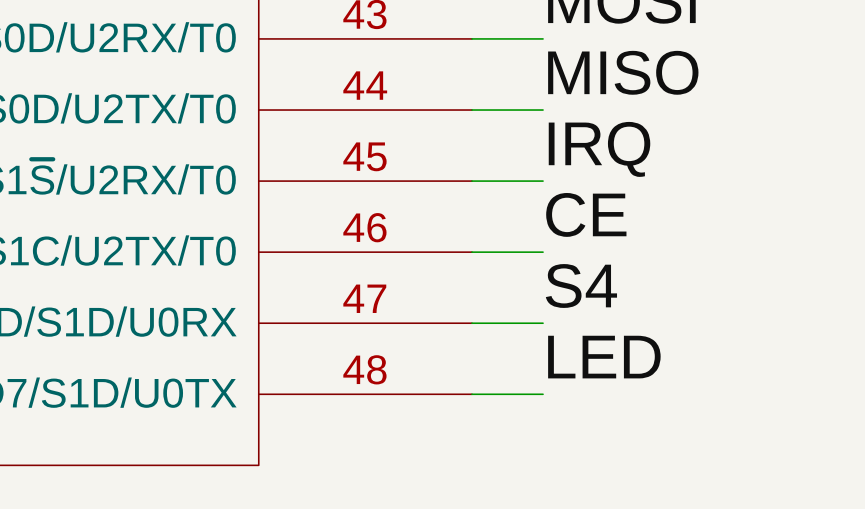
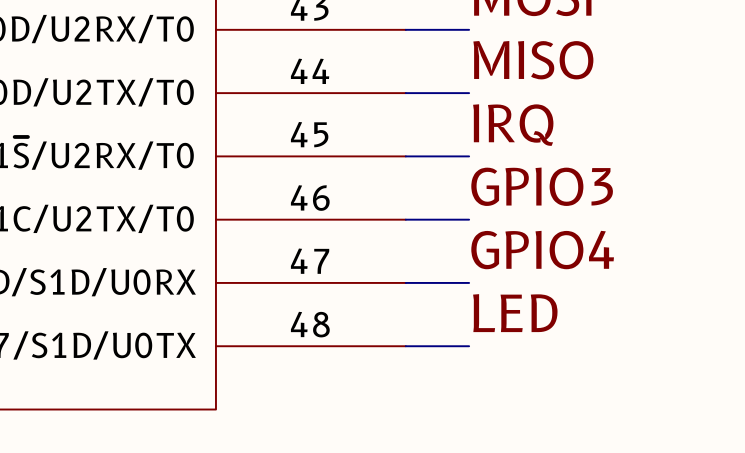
label: CE (586, 214) -> GPIO3 (542, 186)
label: S4 (581, 286) -> GPIO4 (542, 250)

